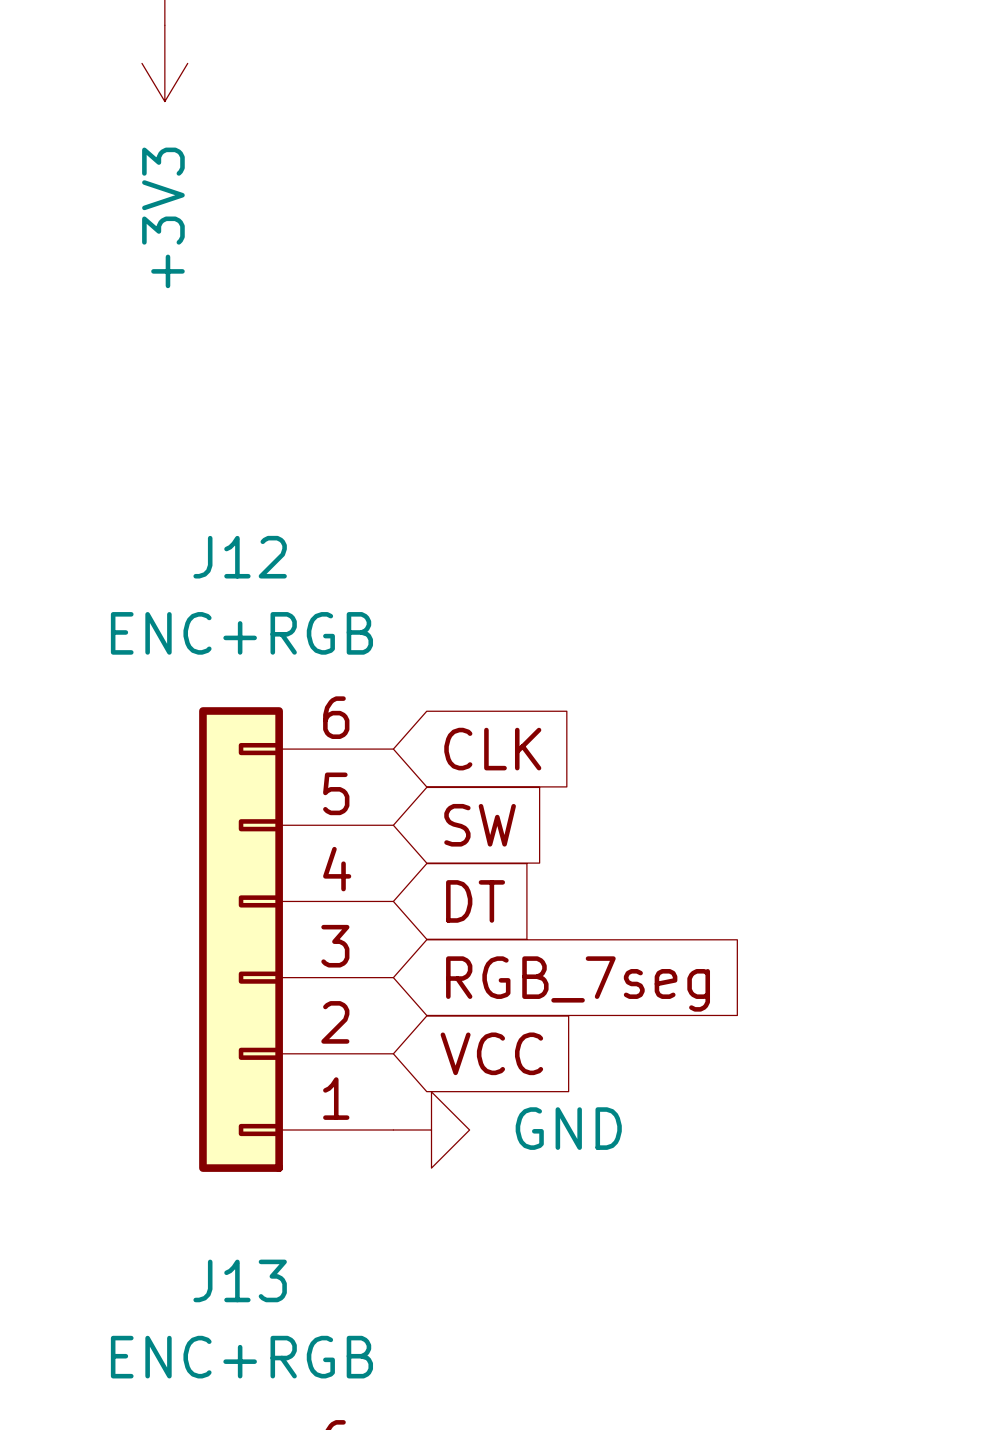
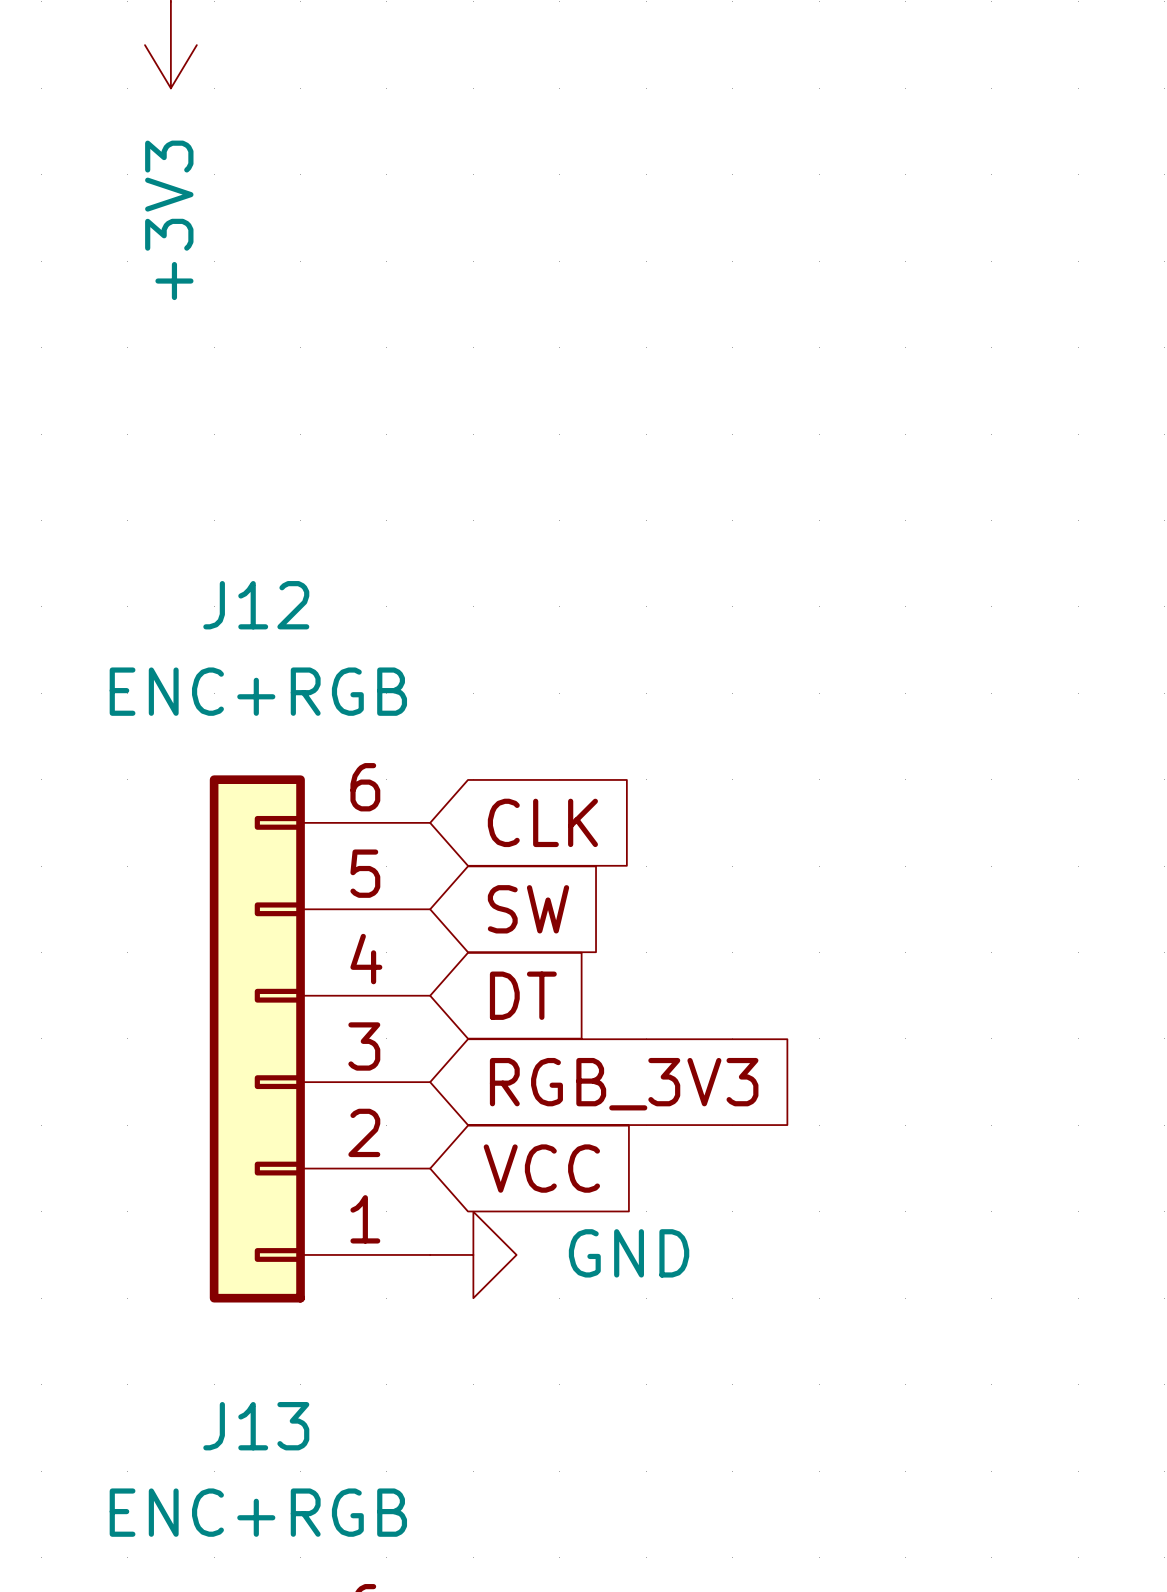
global label: RGB_7seg (578, 983) -> RGB_3V3 (624, 1084)

